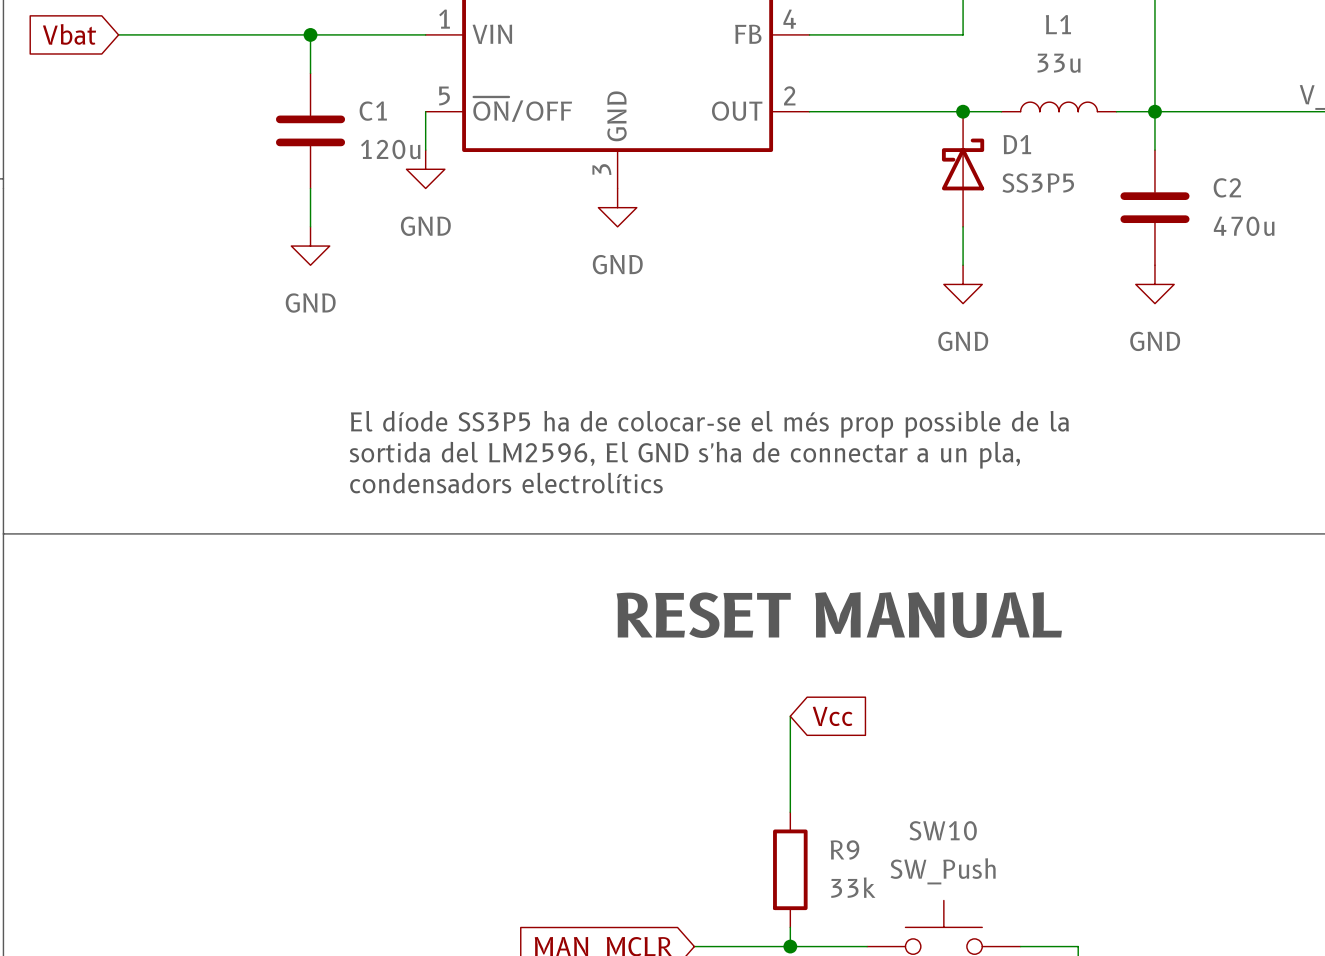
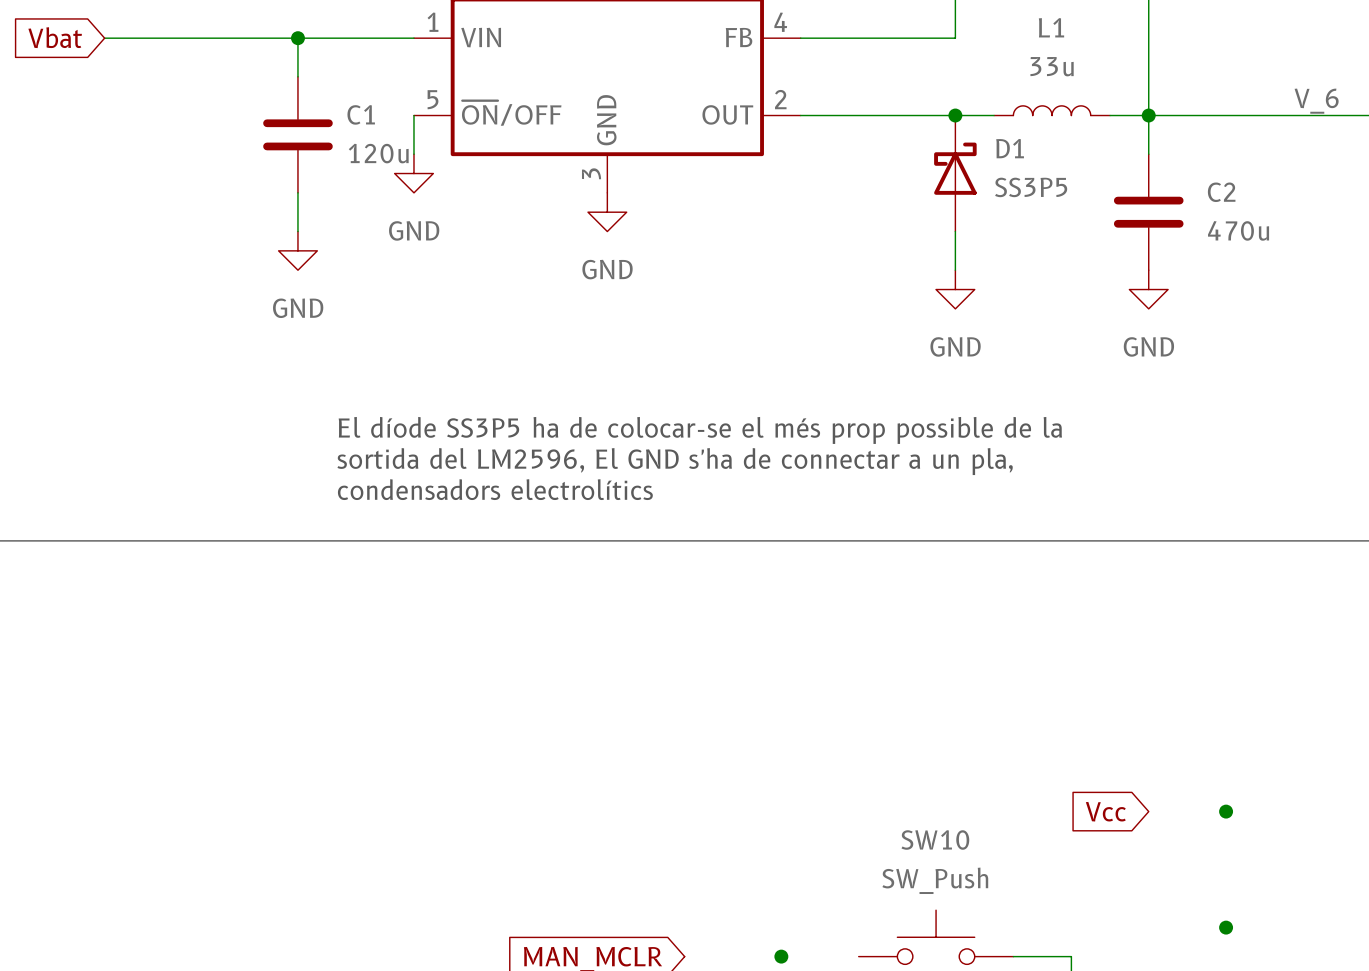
text: RESET MANUAL (839, 615) -> none
wire: (790, 716) (790, 812) -> none
global label: Vcc (832, 716) -> none
global label: none -> Vcc (1105, 811)
junction: none -> (1226, 811)
R9: 33k (790, 869) -> none
junction: none -> (1226, 927)
wire: (790, 927) (790, 946) -> none
wire: (694, 946) (867, 946) -> none

